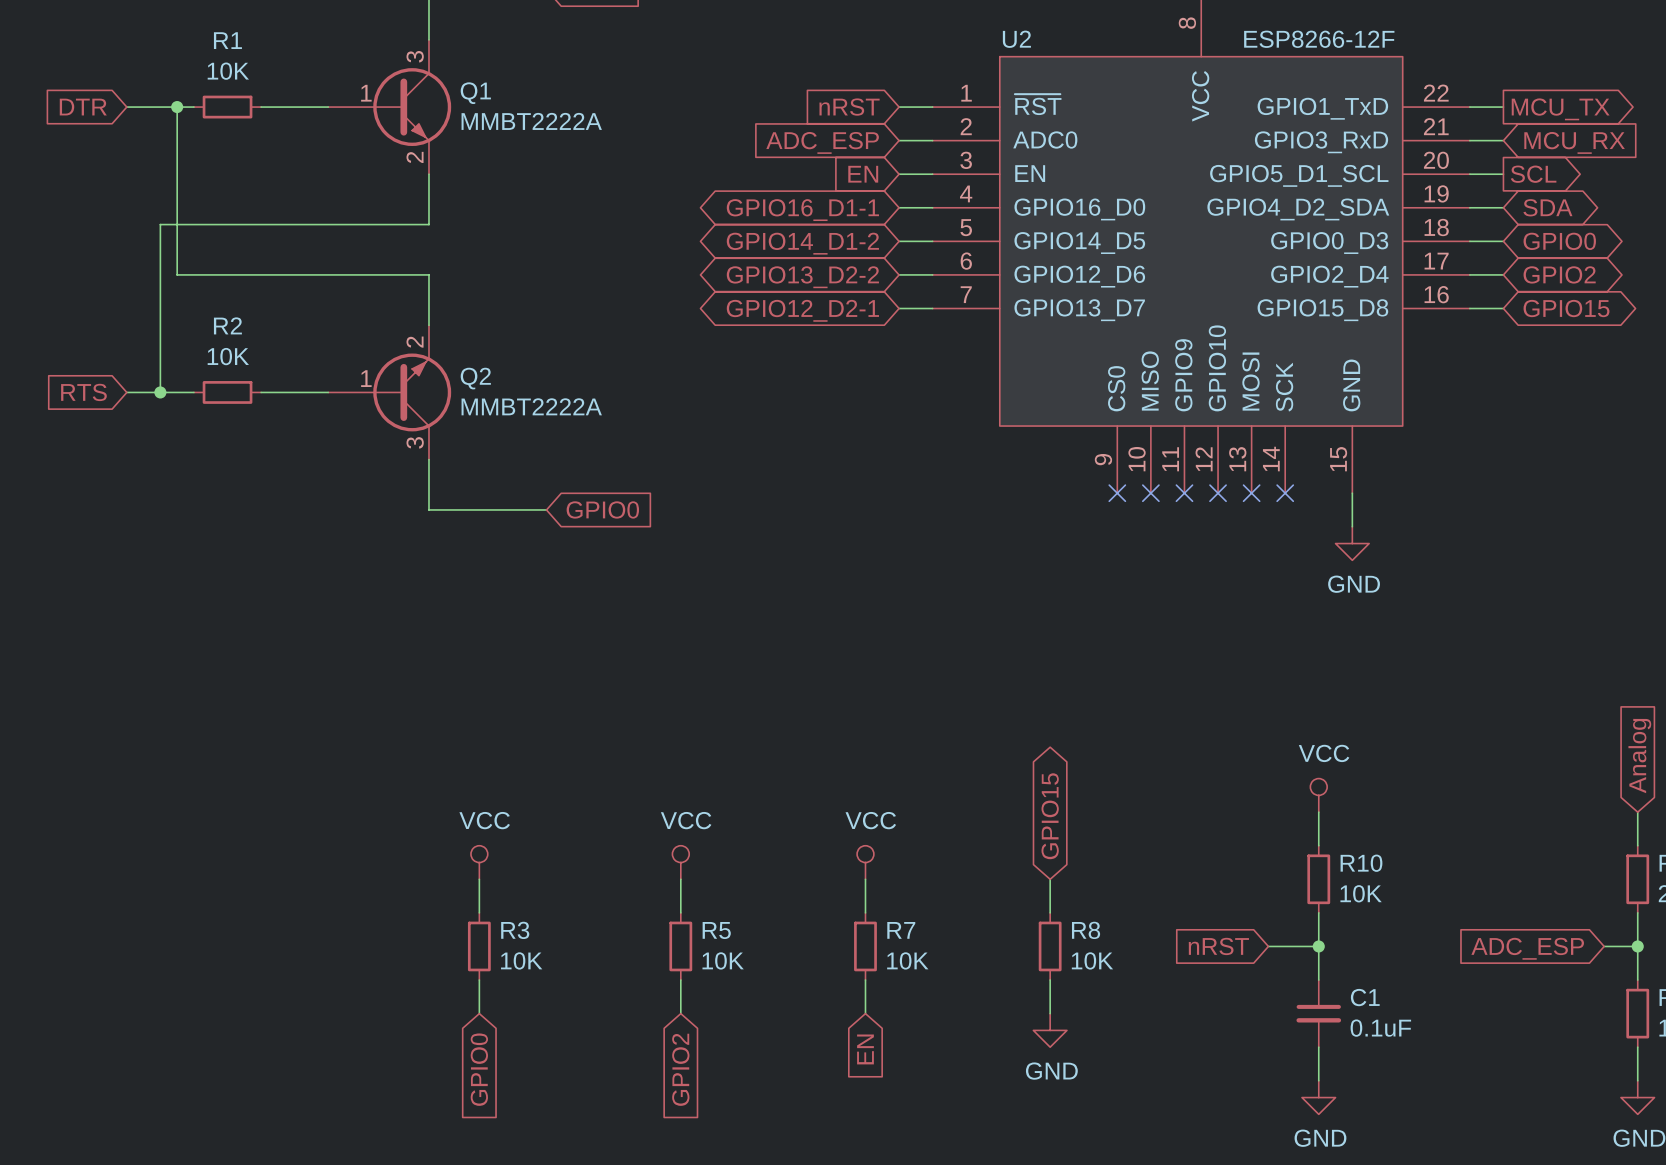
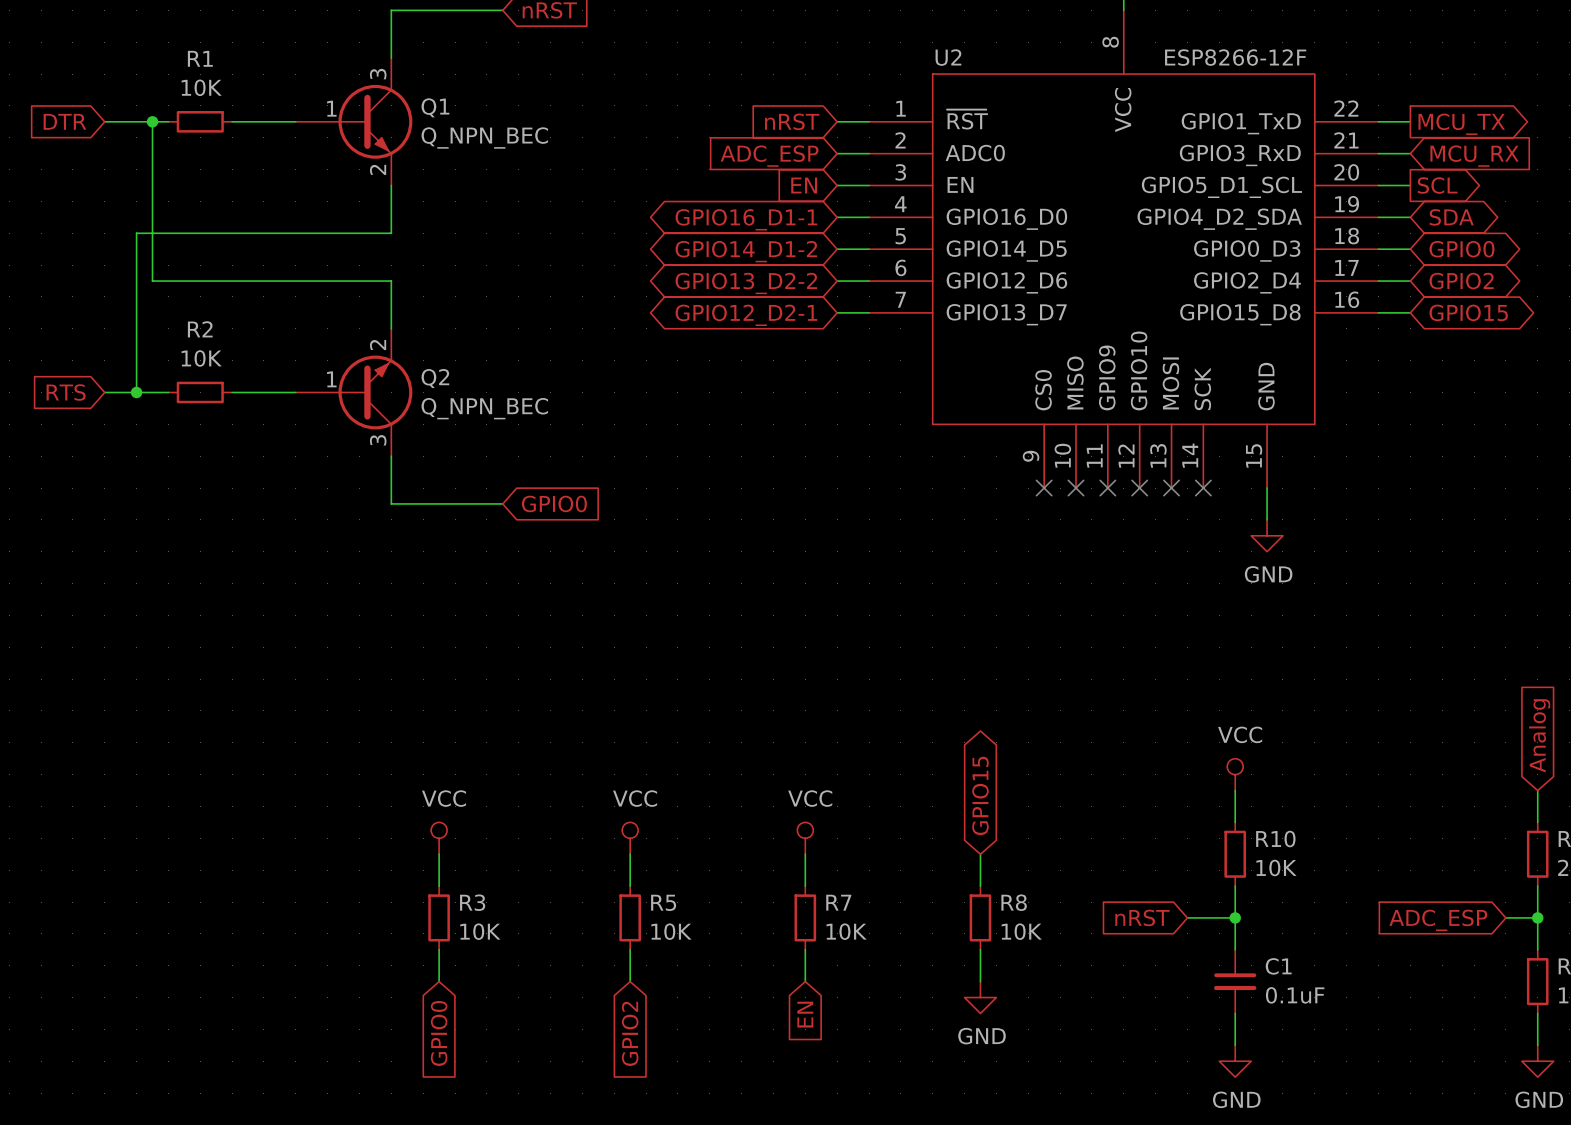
Q1 value: MMBT2222A (531, 121) -> Q_NPN_BEC (484, 137)
Q2 value: MMBT2222A (531, 406) -> Q_NPN_BEC (484, 408)

